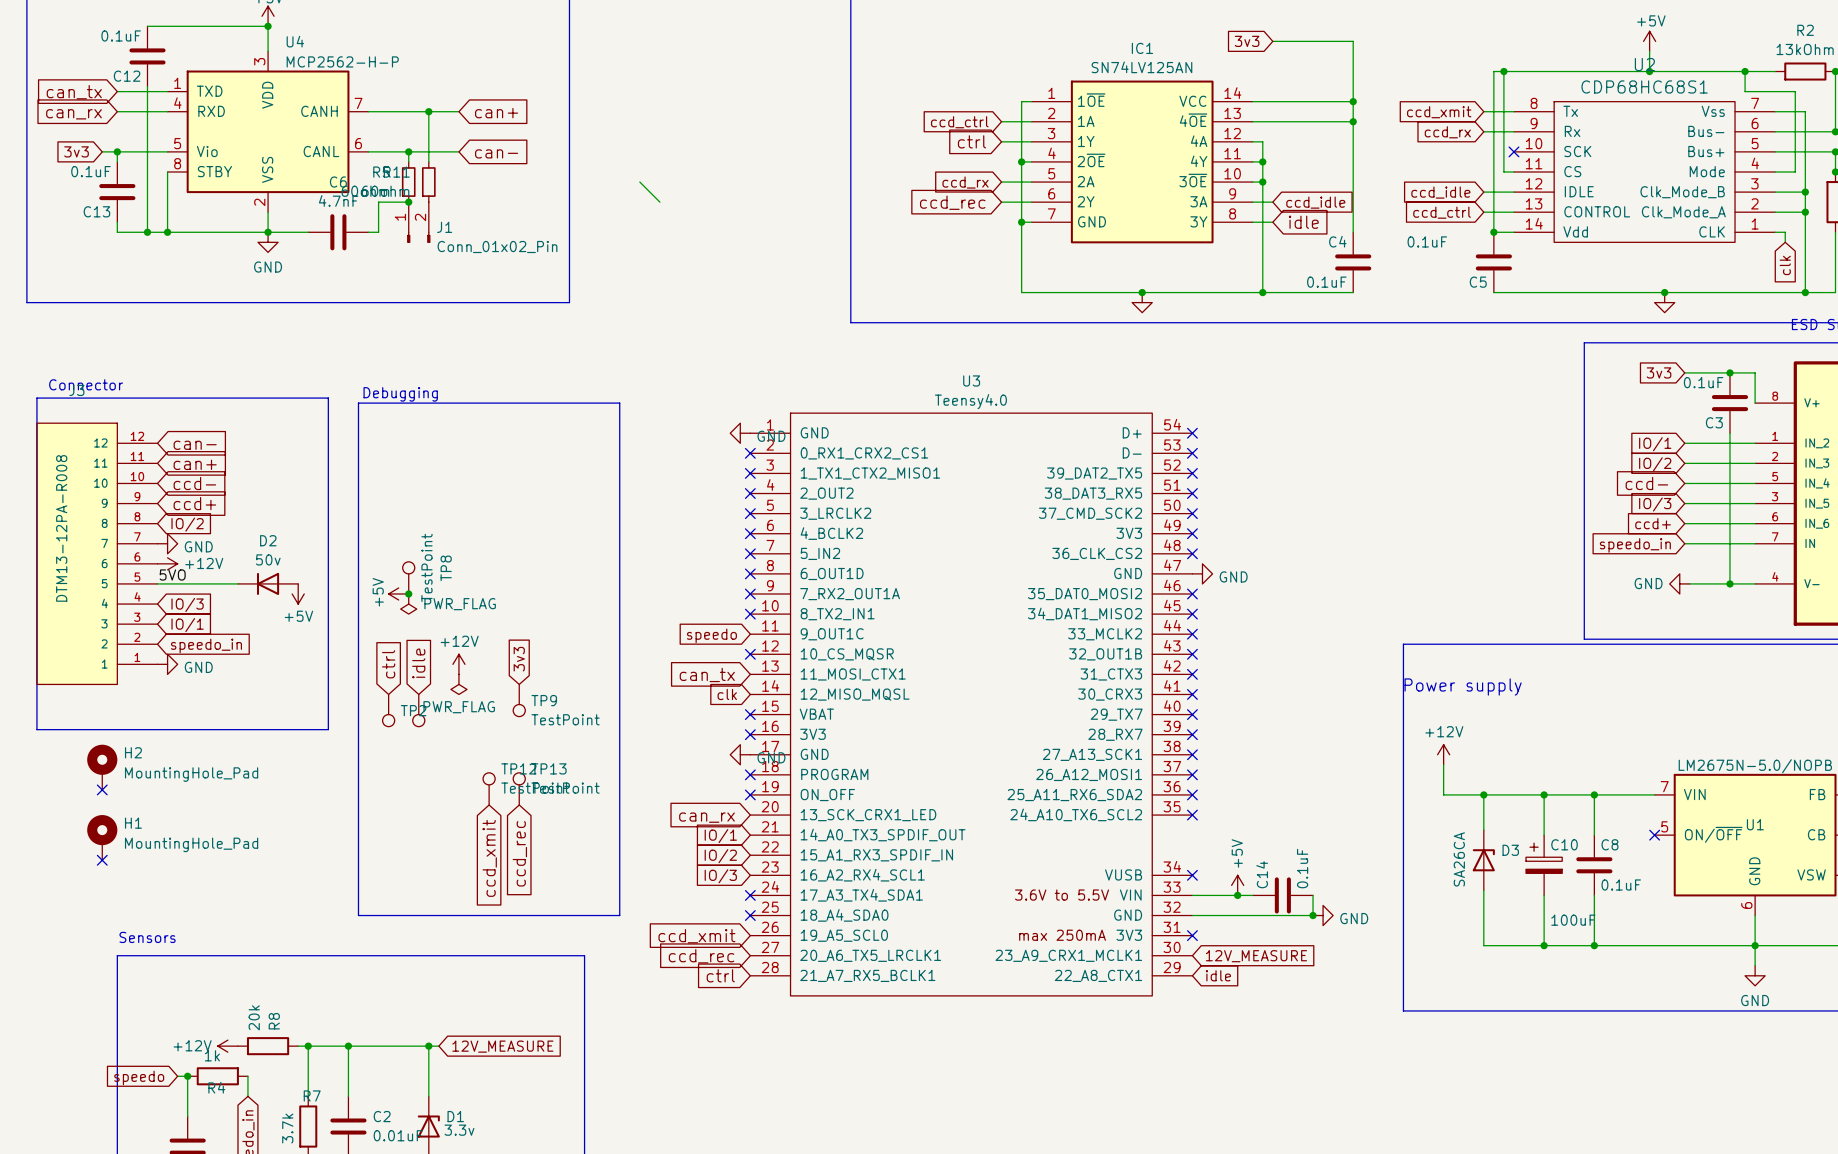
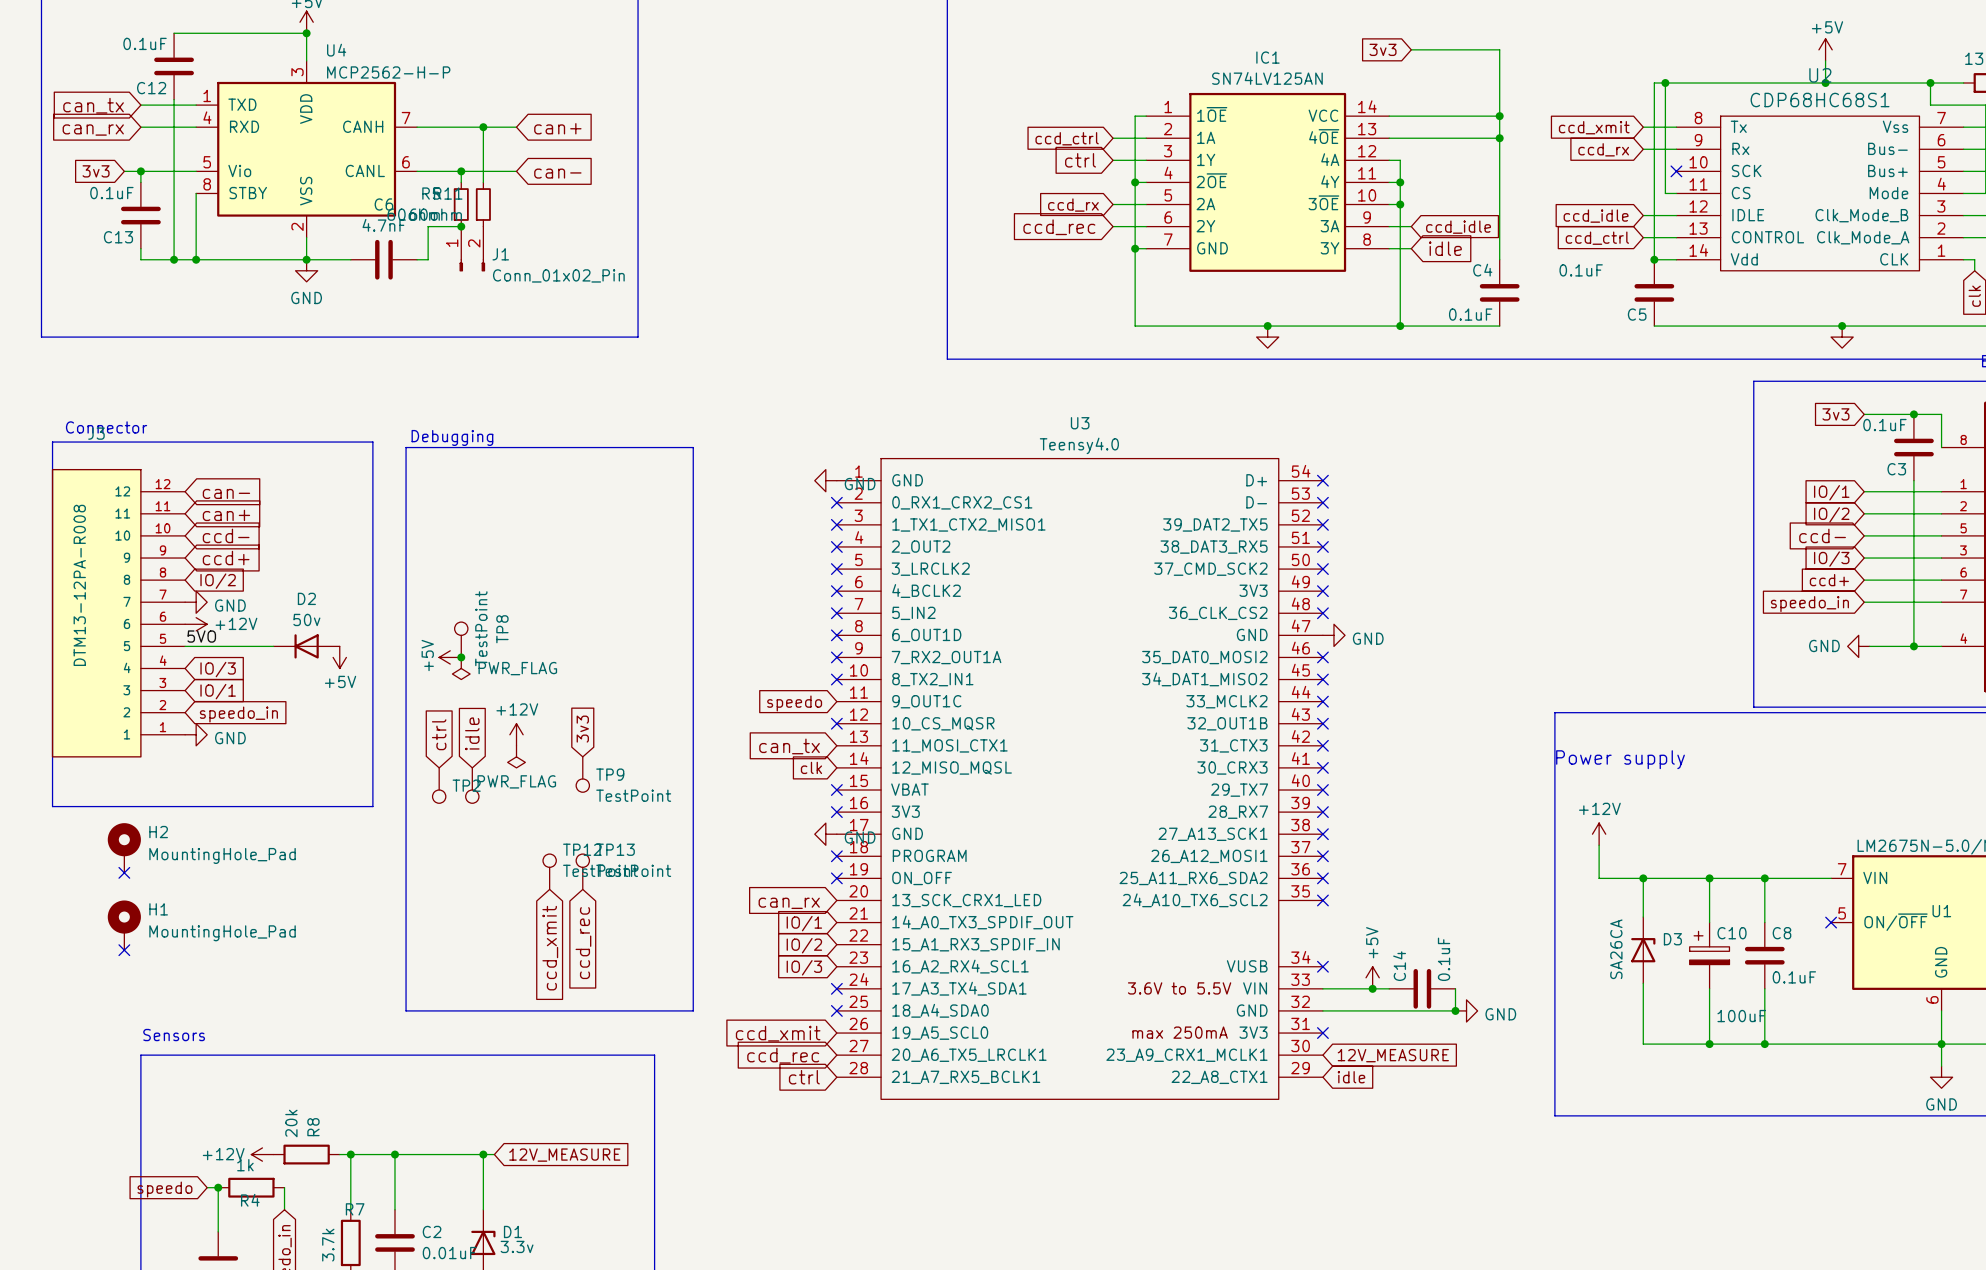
wire: (639, 182) (659, 202) -> none

